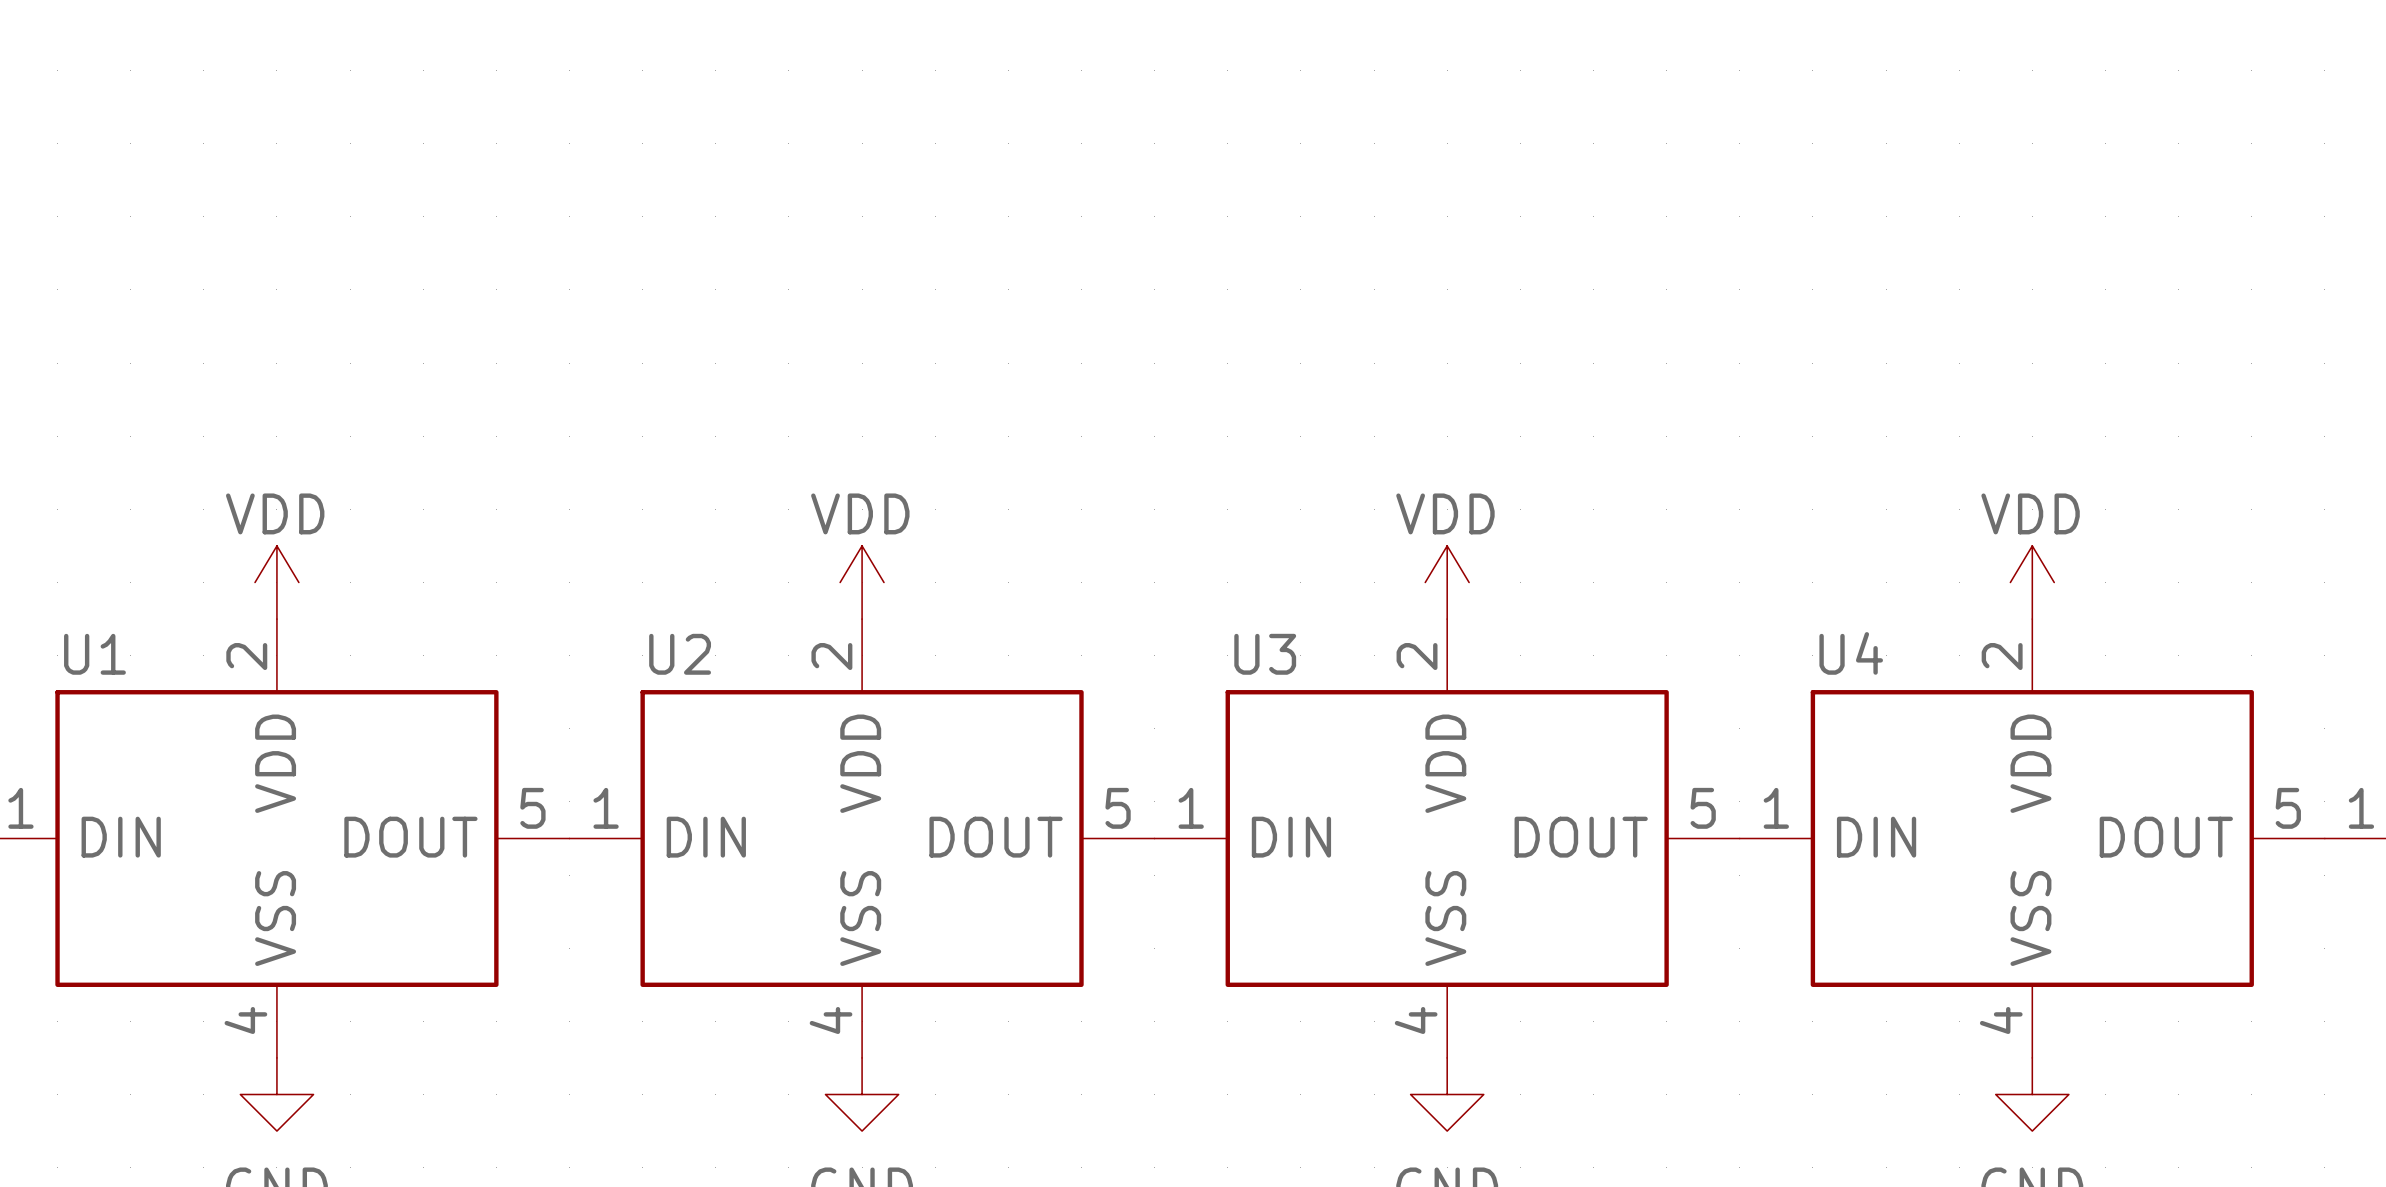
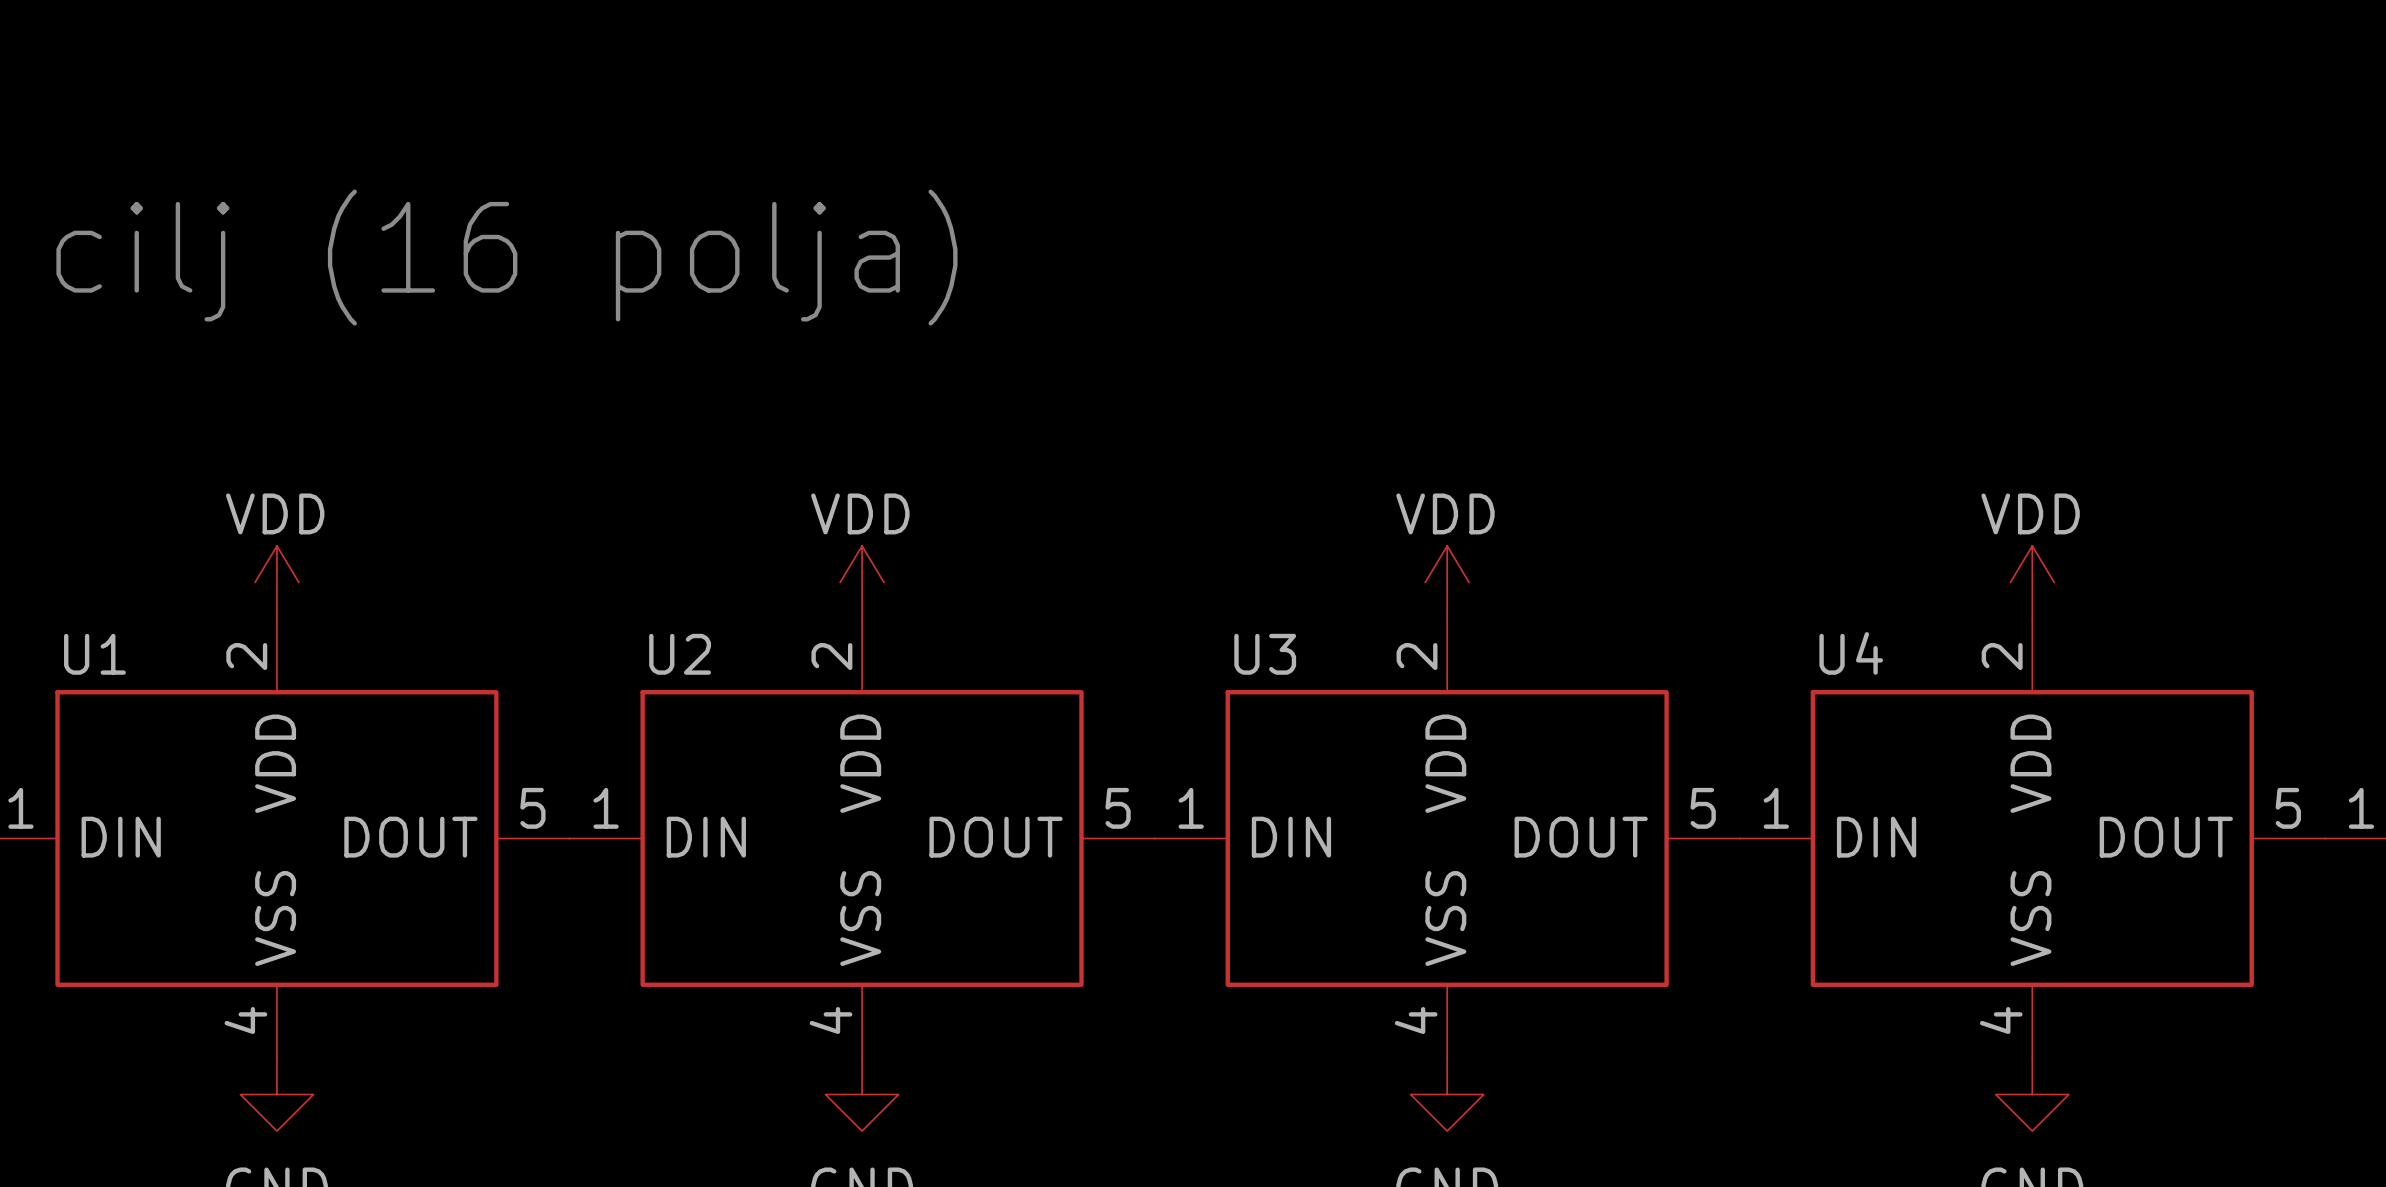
text: none -> cilj (16 polja) (506, 257)

